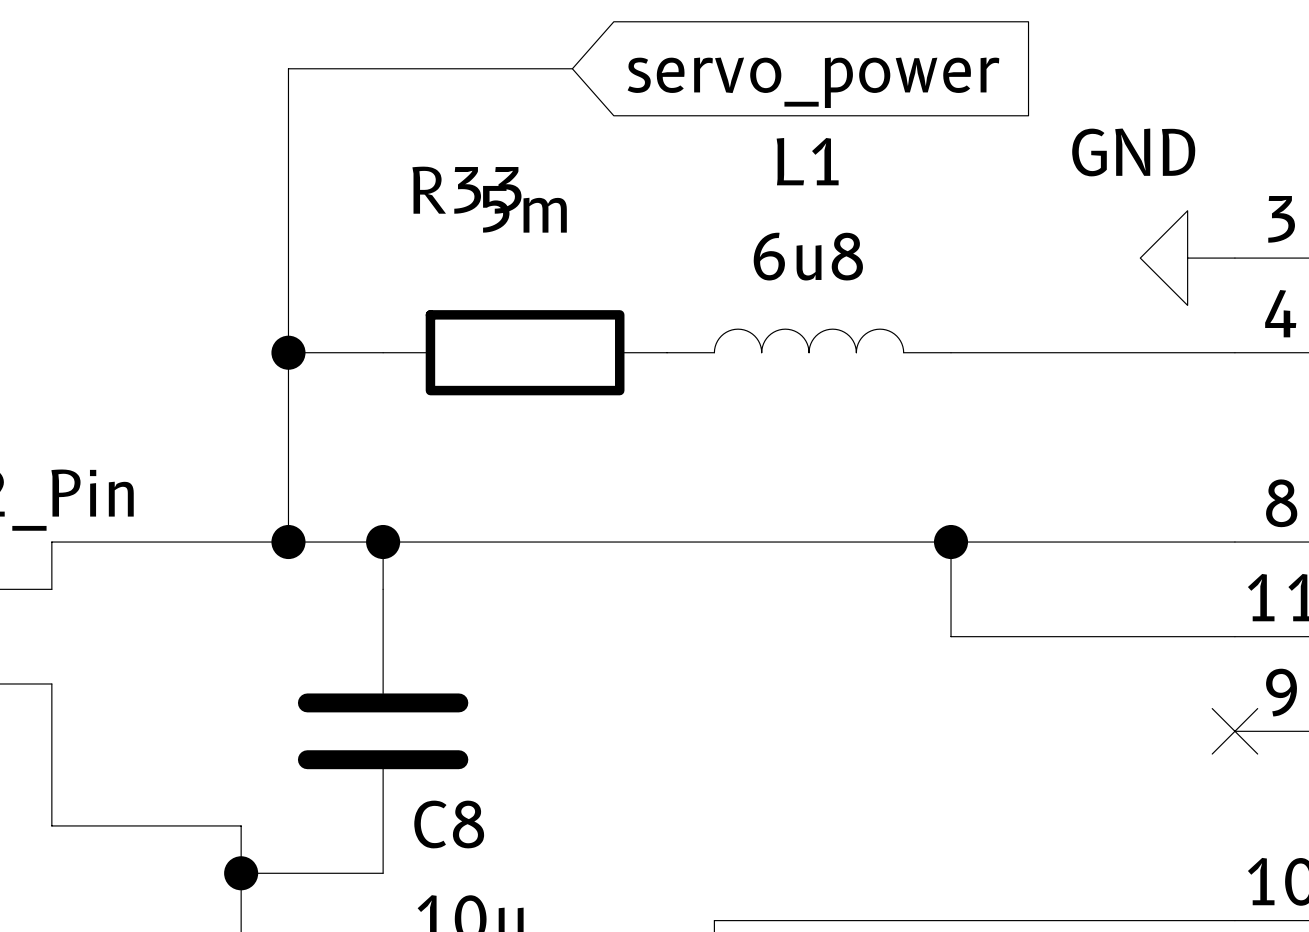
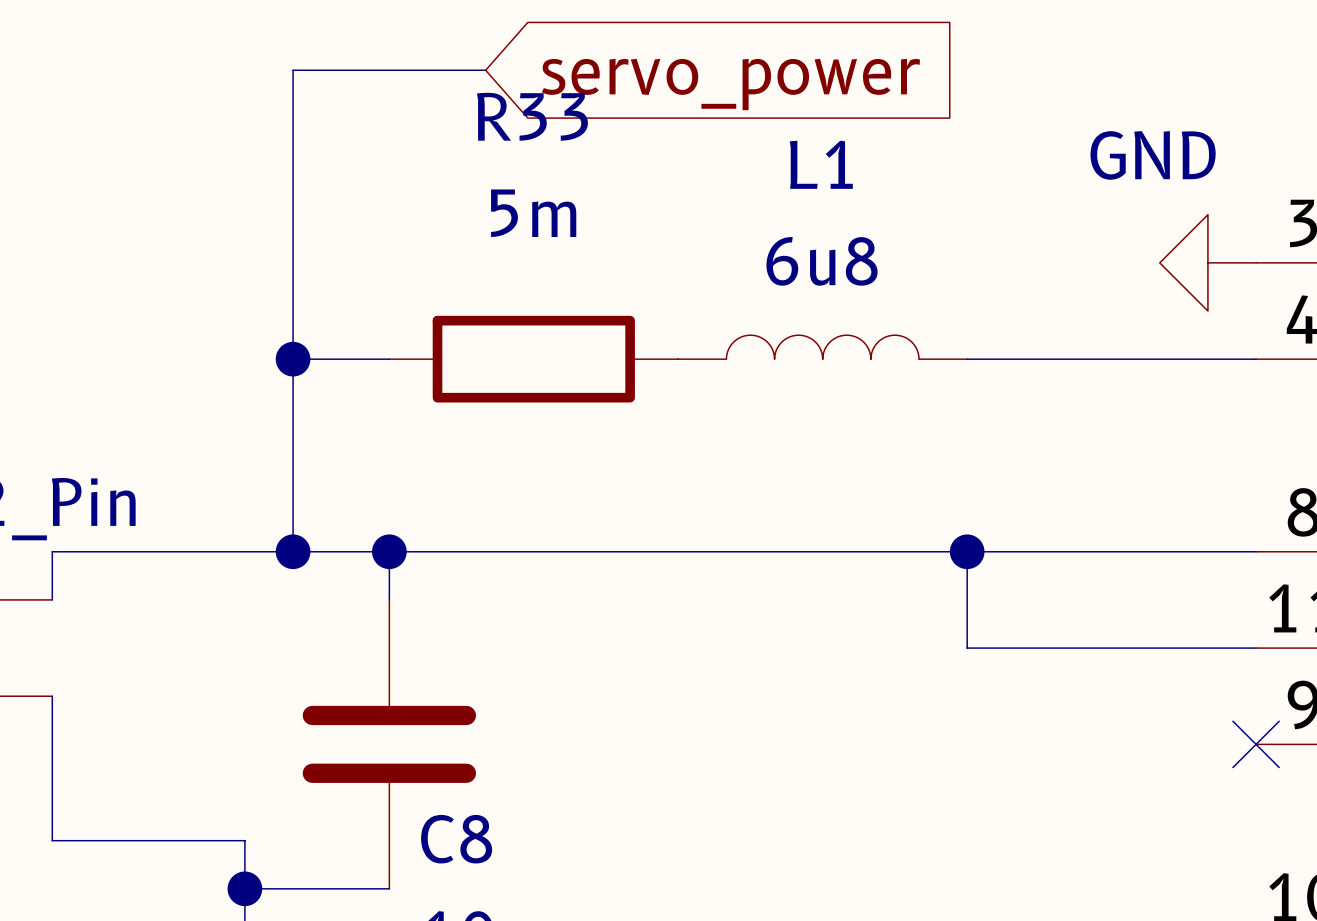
wire: (477, 68) (572, 68) -> none
global label position: servo_power (813, 82) -> servo_power (730, 84)
R33 name position: R33 (466, 190) -> R33 (532, 116)

